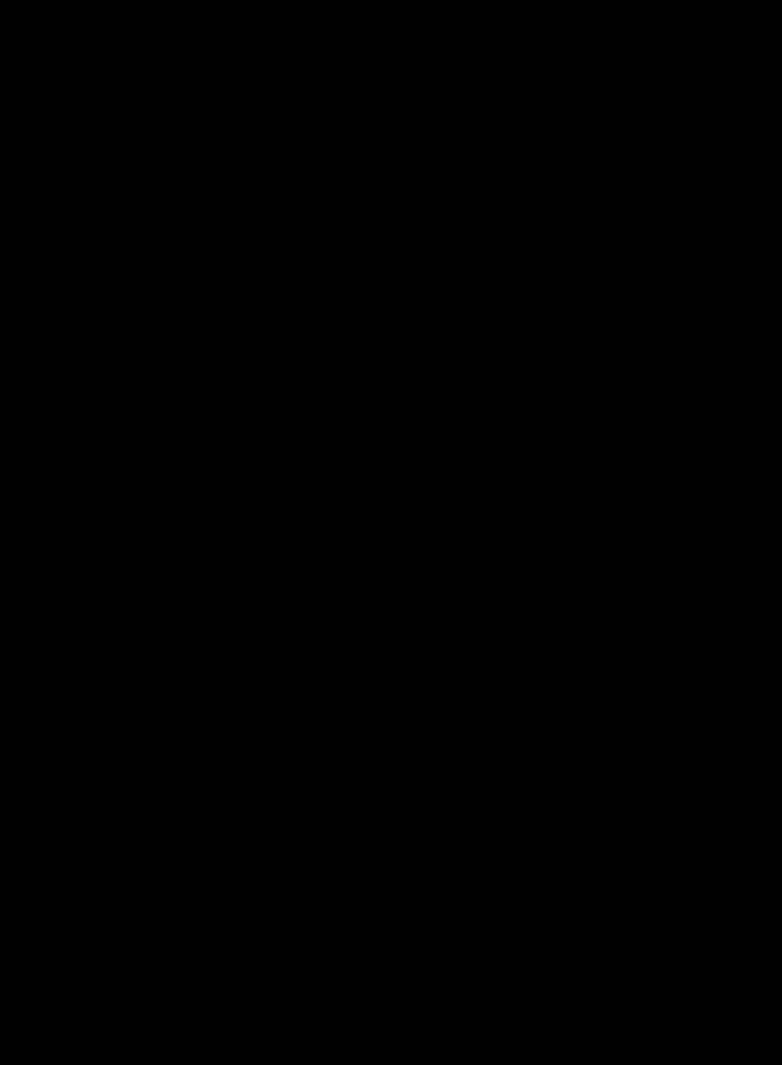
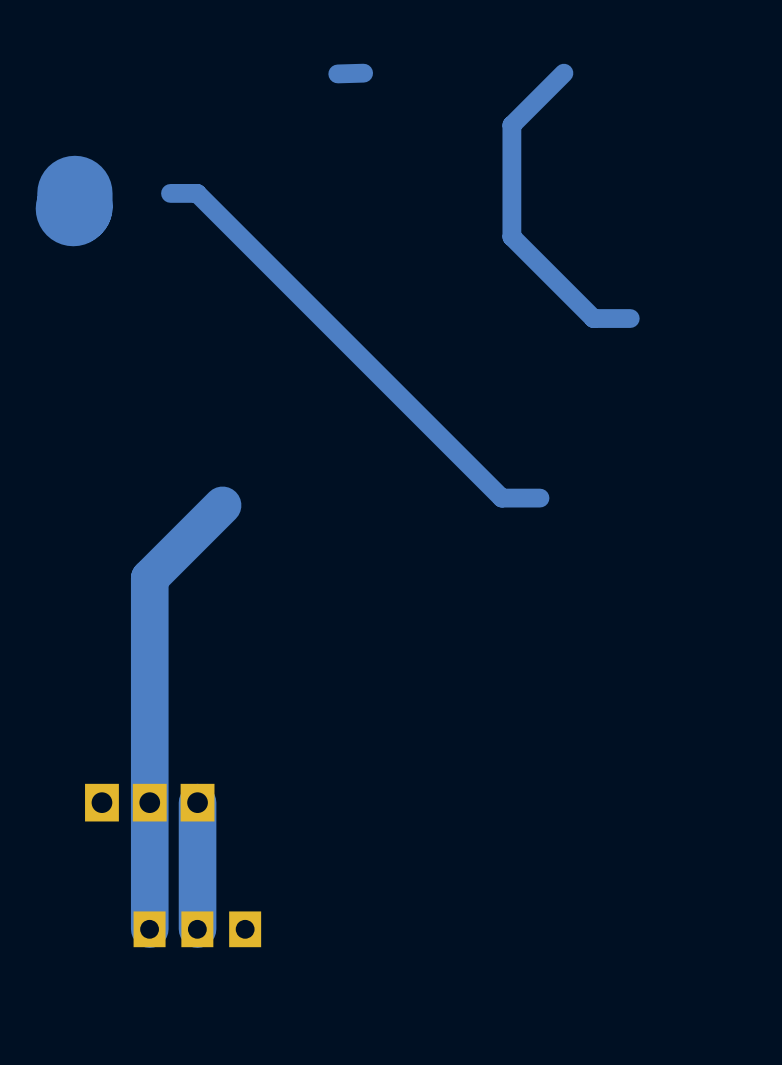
bottom track: none -> (363, 73) (337, 73)
bottom track: none -> (563, 73) (511, 125) (511, 236) (593, 318) (630, 318)
bottom track: none -> (74, 193) (73, 208)
bottom track: none -> (170, 193) (197, 193) (501, 498) (540, 498)
bottom track: none -> (222, 505) (149, 578) (149, 929)
part: none -> (149, 802)
bottom track: none -> (197, 802) (197, 929)
part: none -> (197, 929)

